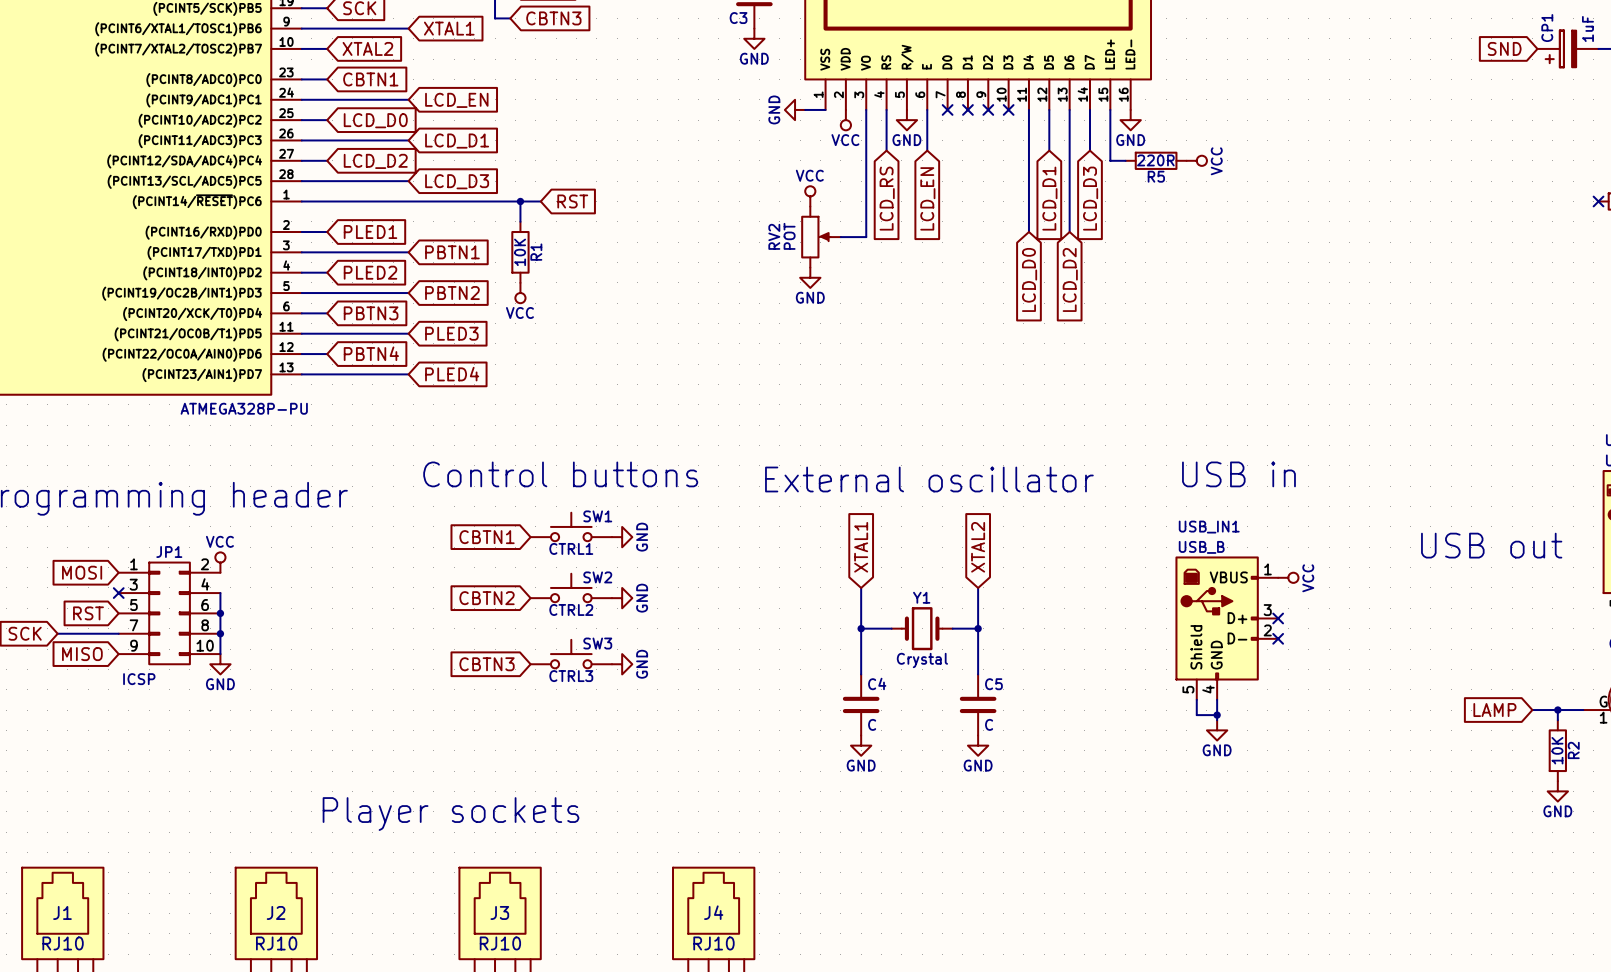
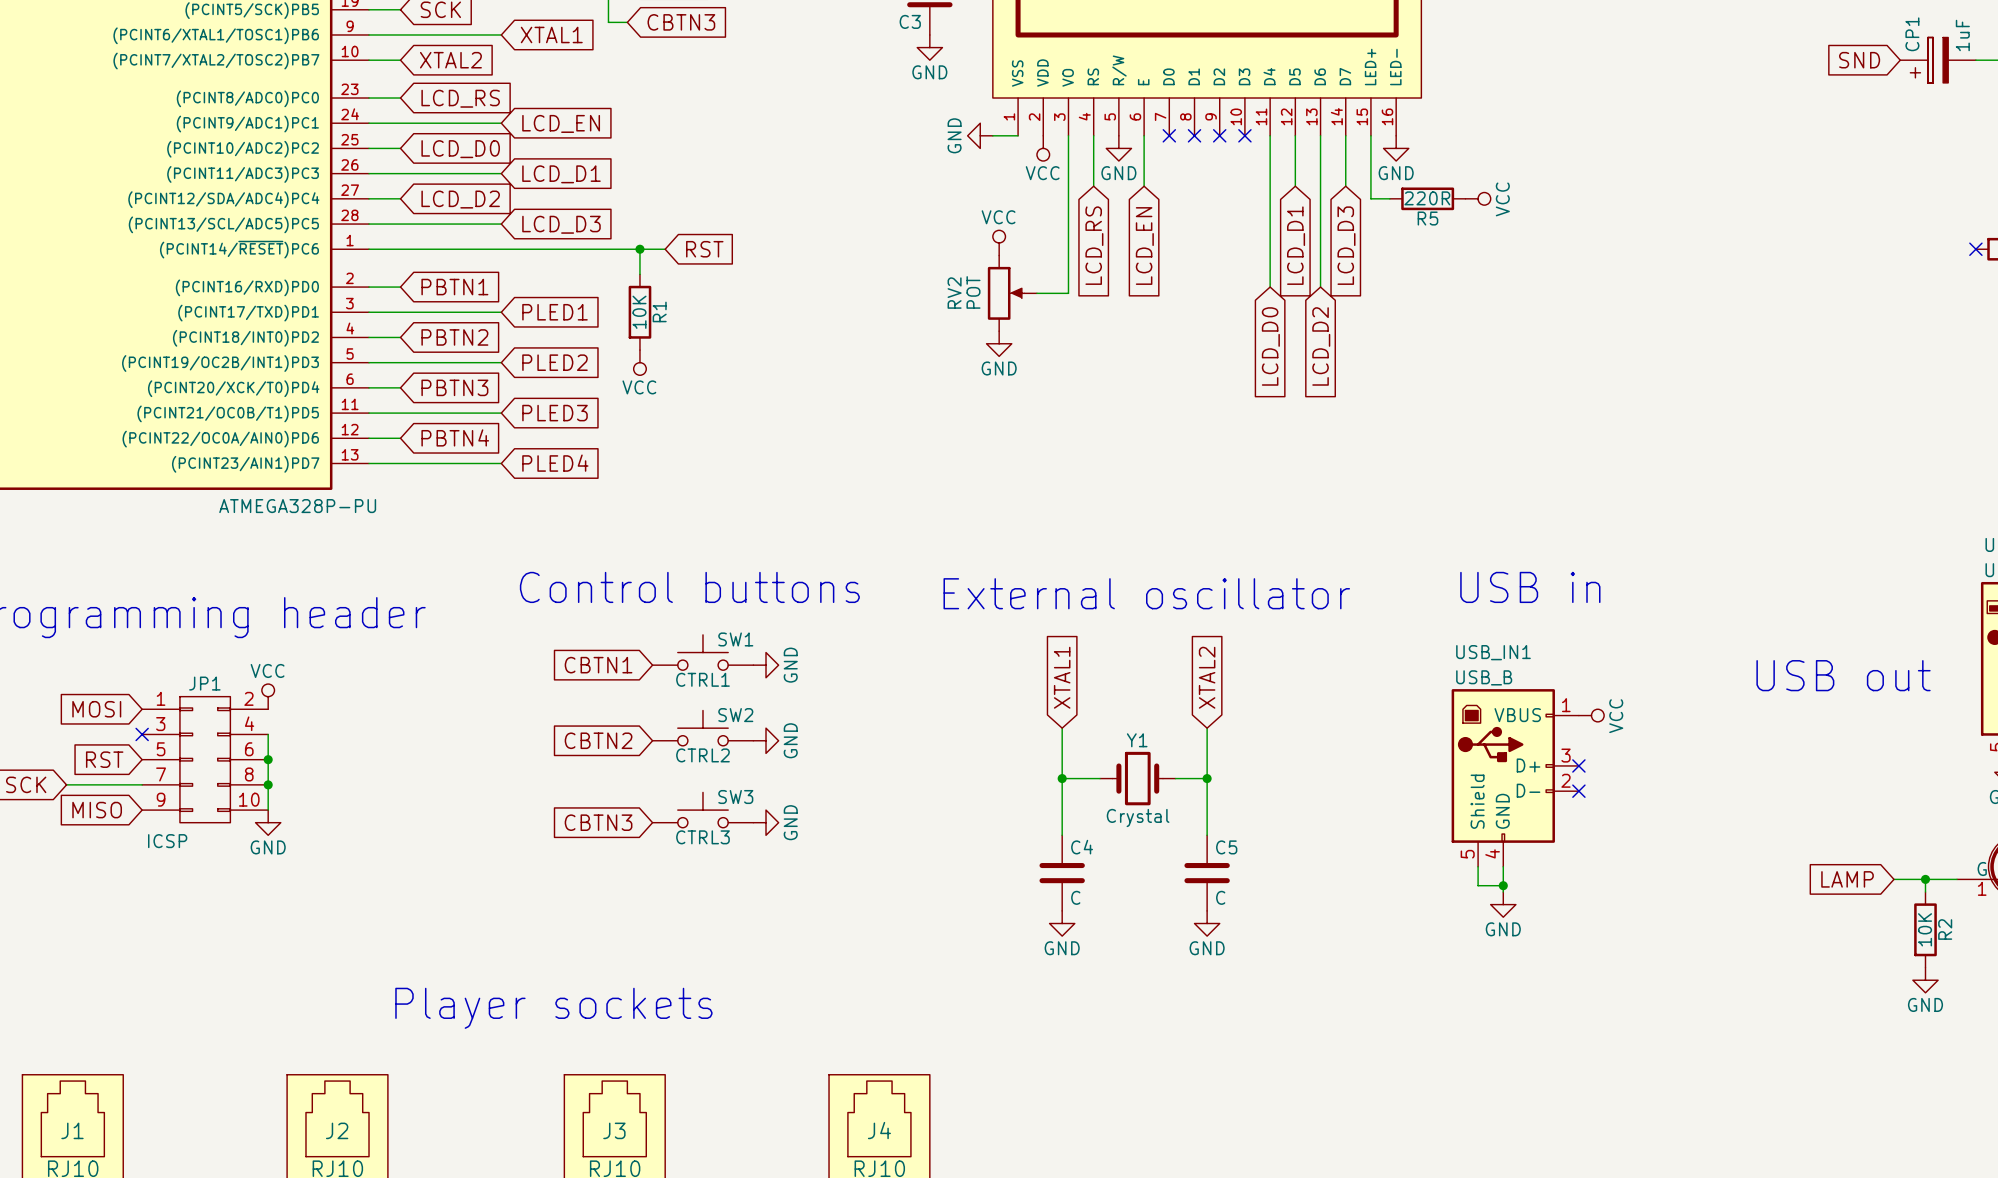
global label: CBTN1 (370, 79) -> LCD_RS (460, 98)
global label: PLED1 (370, 232) -> PBTN1 (454, 287)
global label: PBTN1 (452, 252) -> PLED1 (554, 312)
global label: PLED2 (370, 272) -> PBTN2 (454, 337)
global label: PBTN2 (452, 293) -> PLED2 (554, 362)

